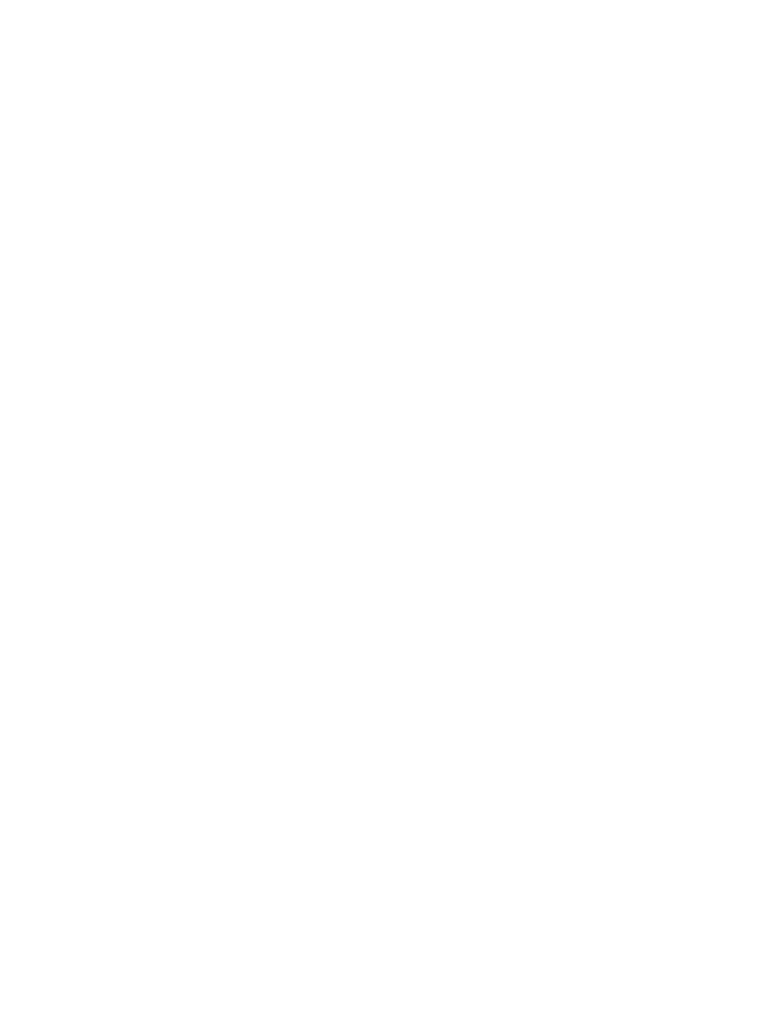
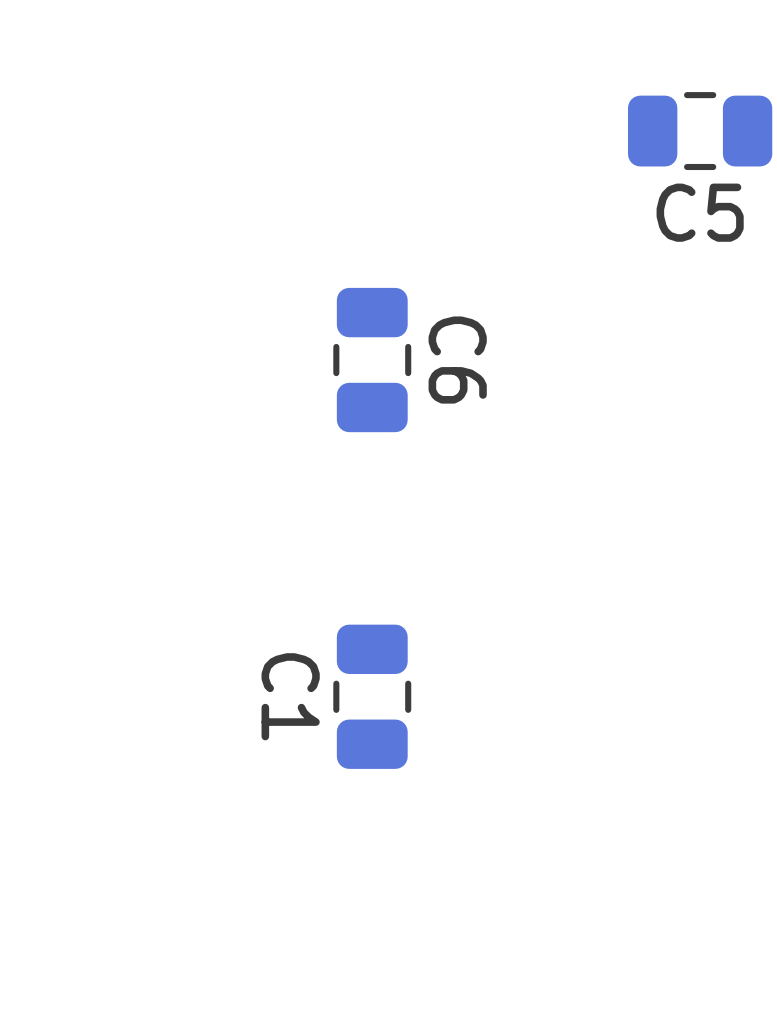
C5: none -> (700, 131)
C6: none -> (372, 360)
C1: none -> (372, 696)

